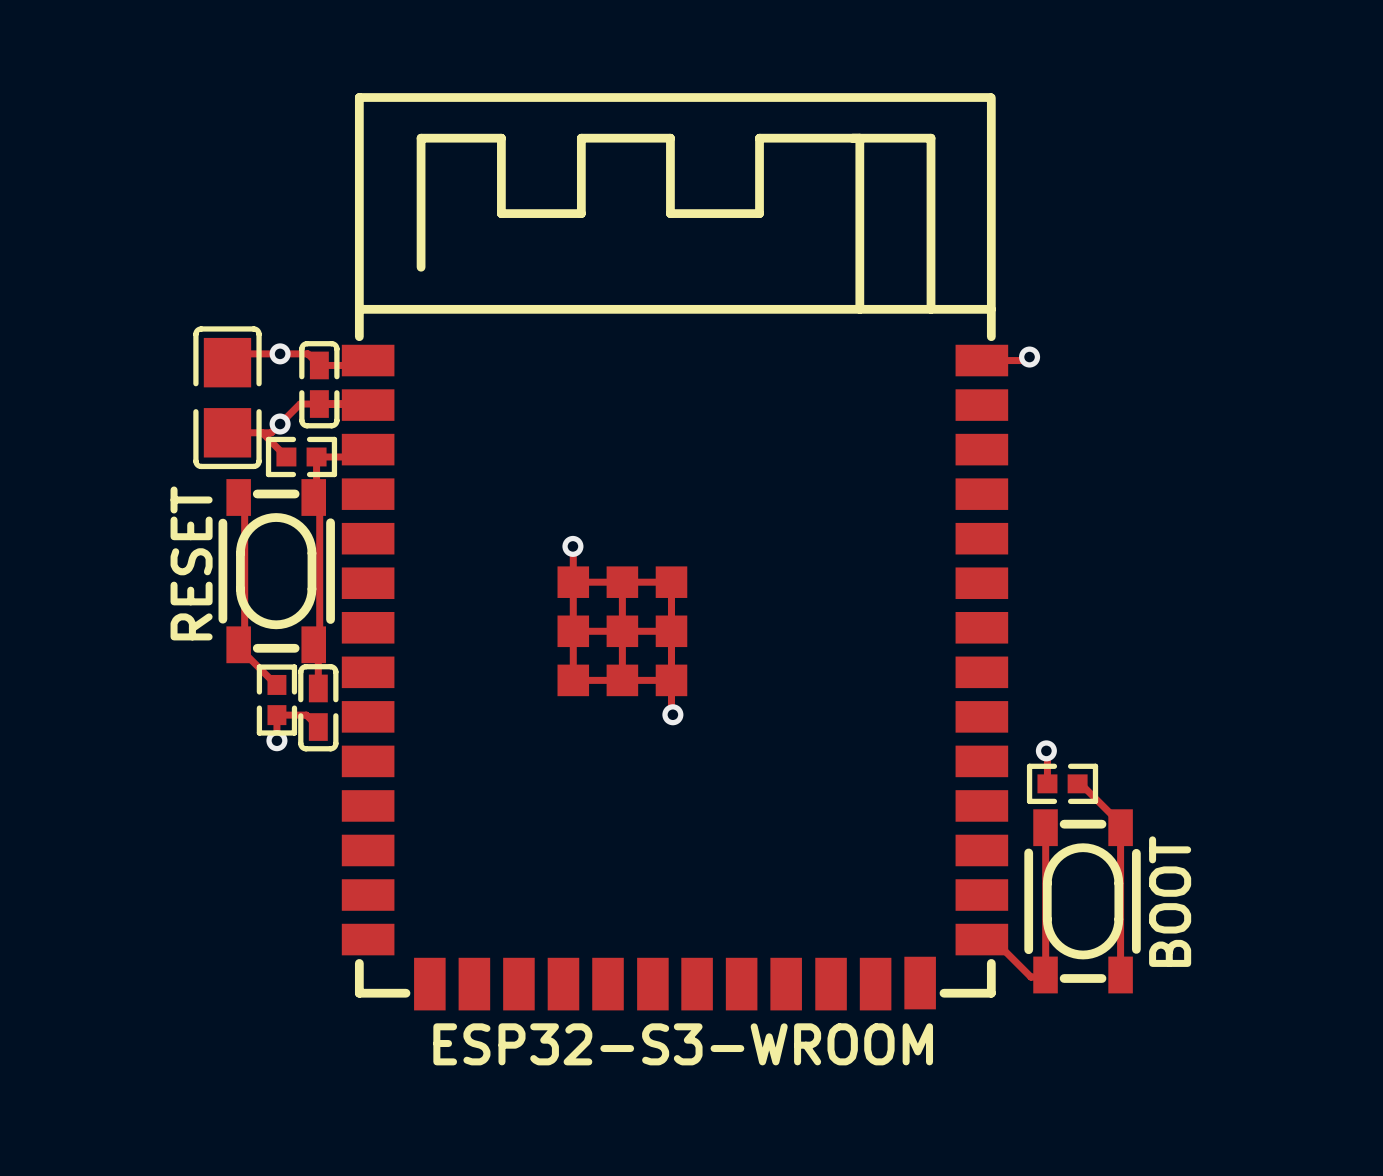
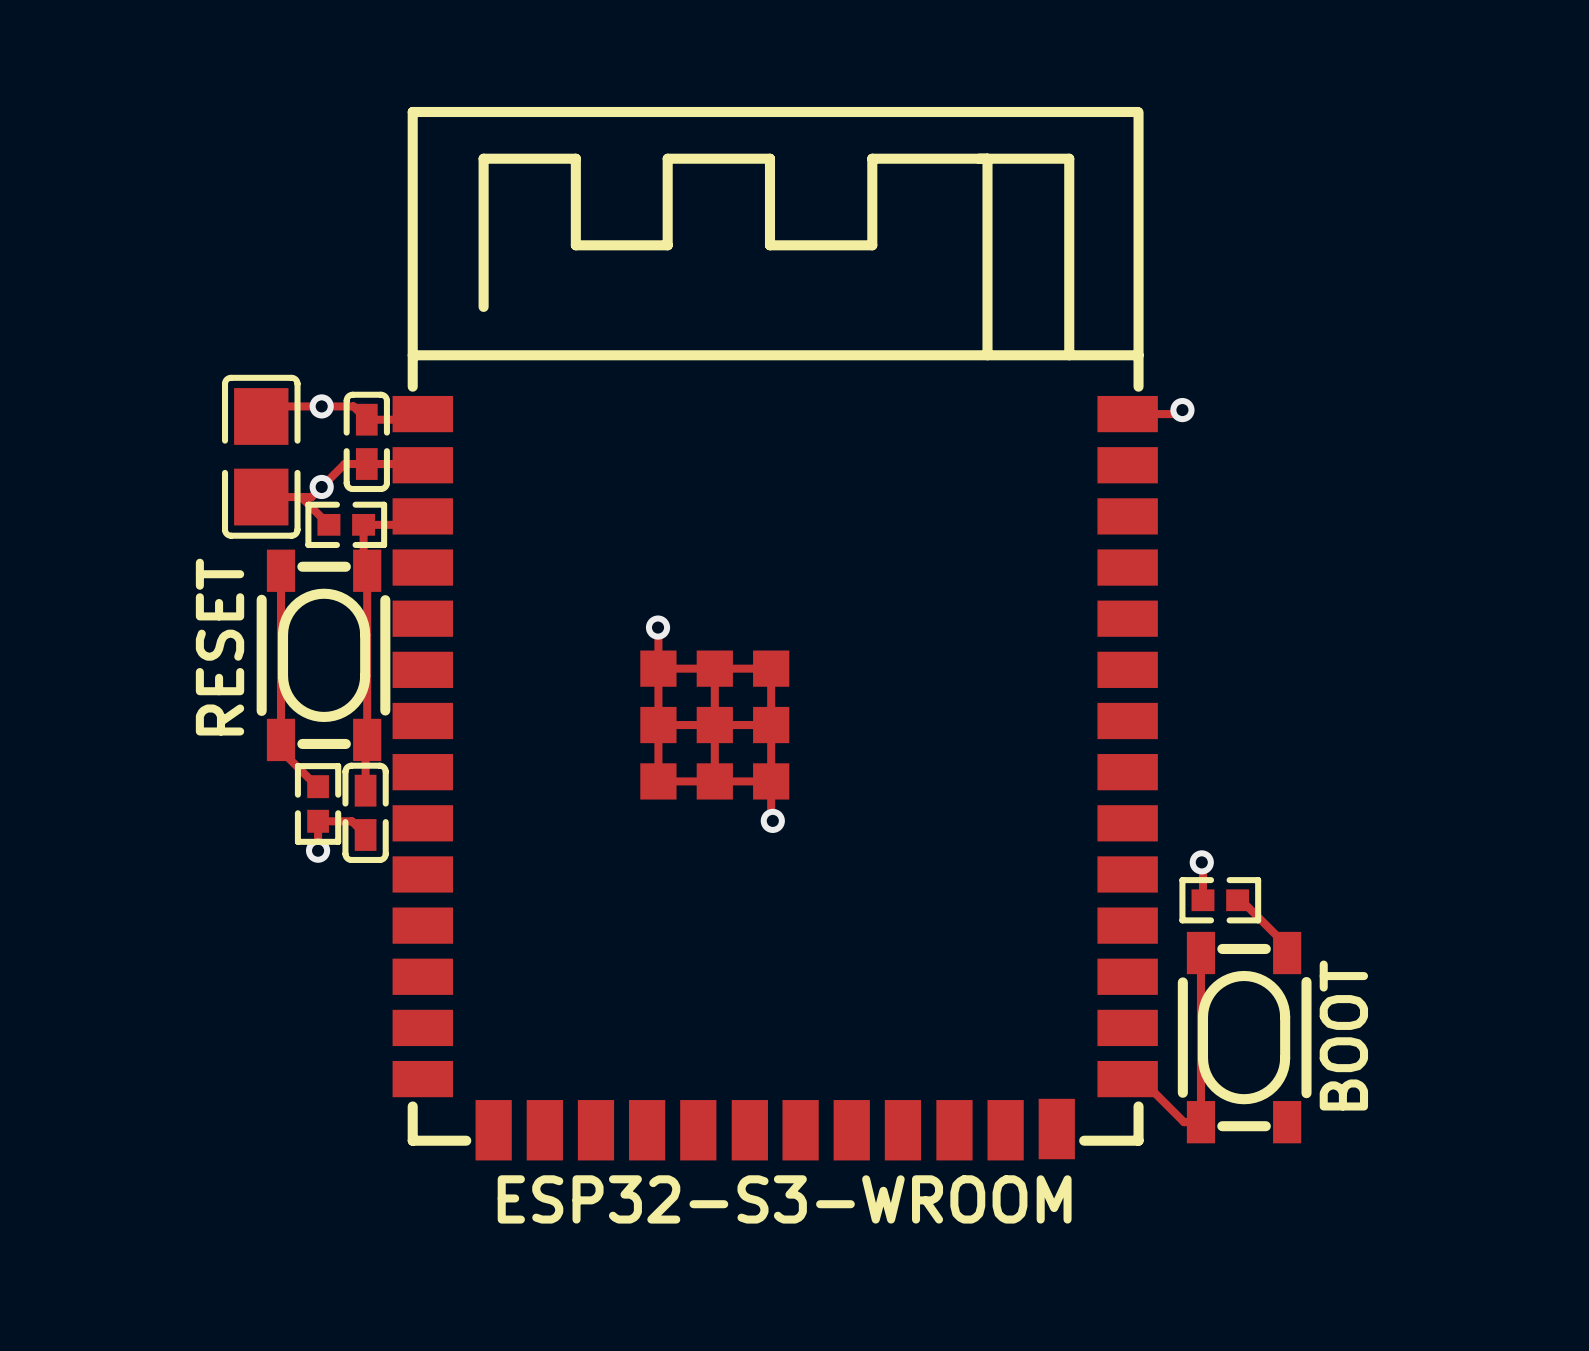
part rotation: 0° (276, 571) -> 180° (323, 655)
part rotation: 0° (1082, 901) -> 180° (1244, 1037)

